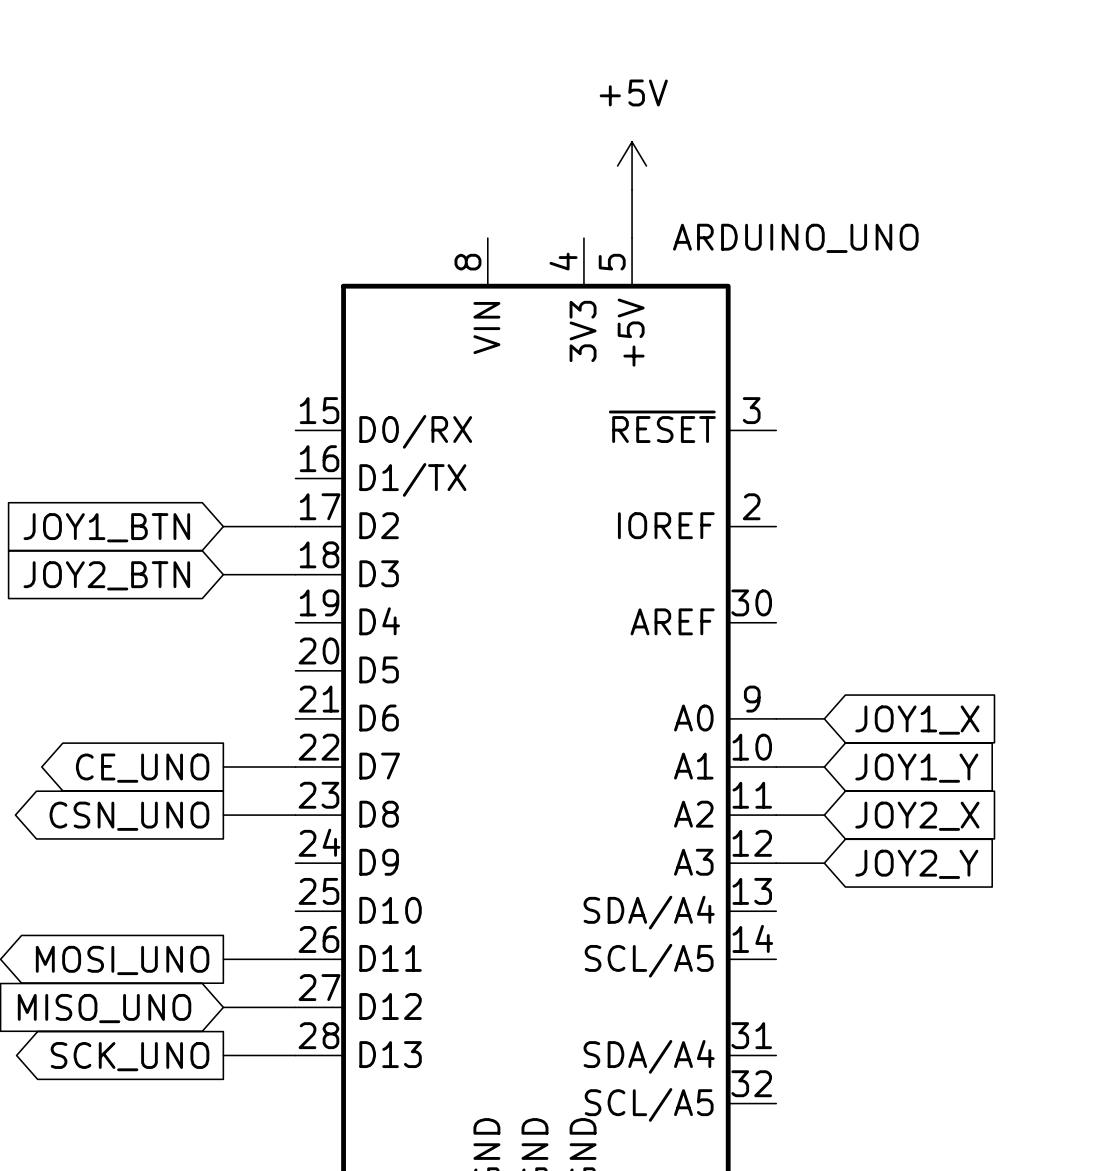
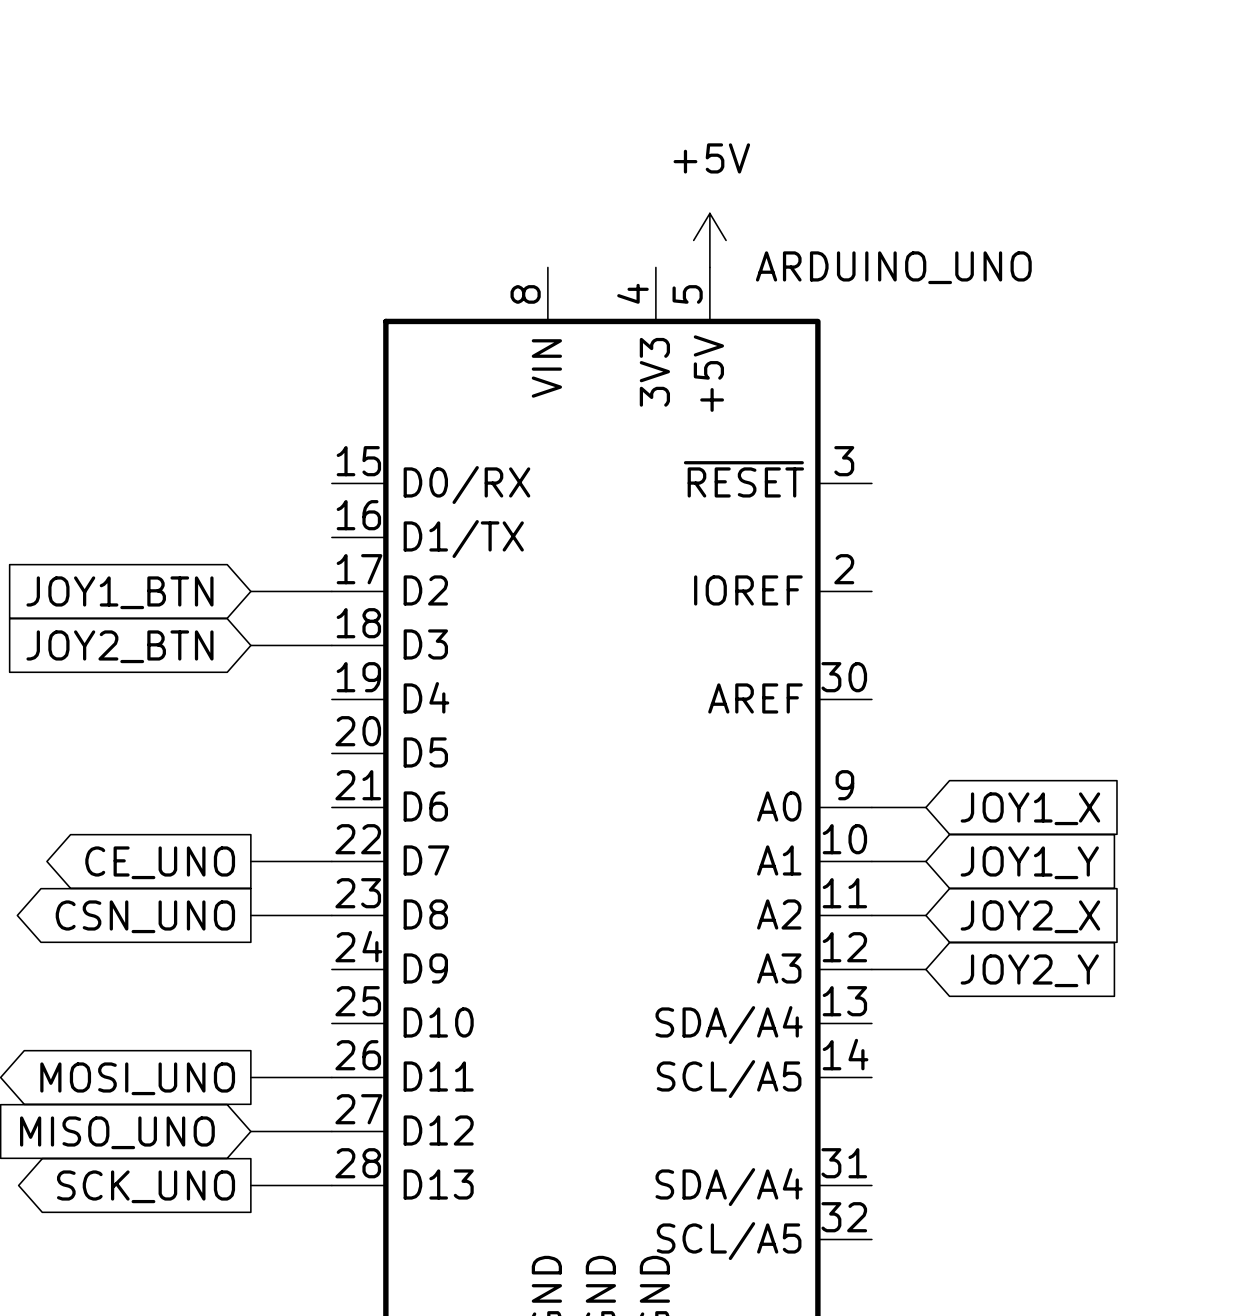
power symbol position: +5V (632, 165) -> +5V (709, 240)

